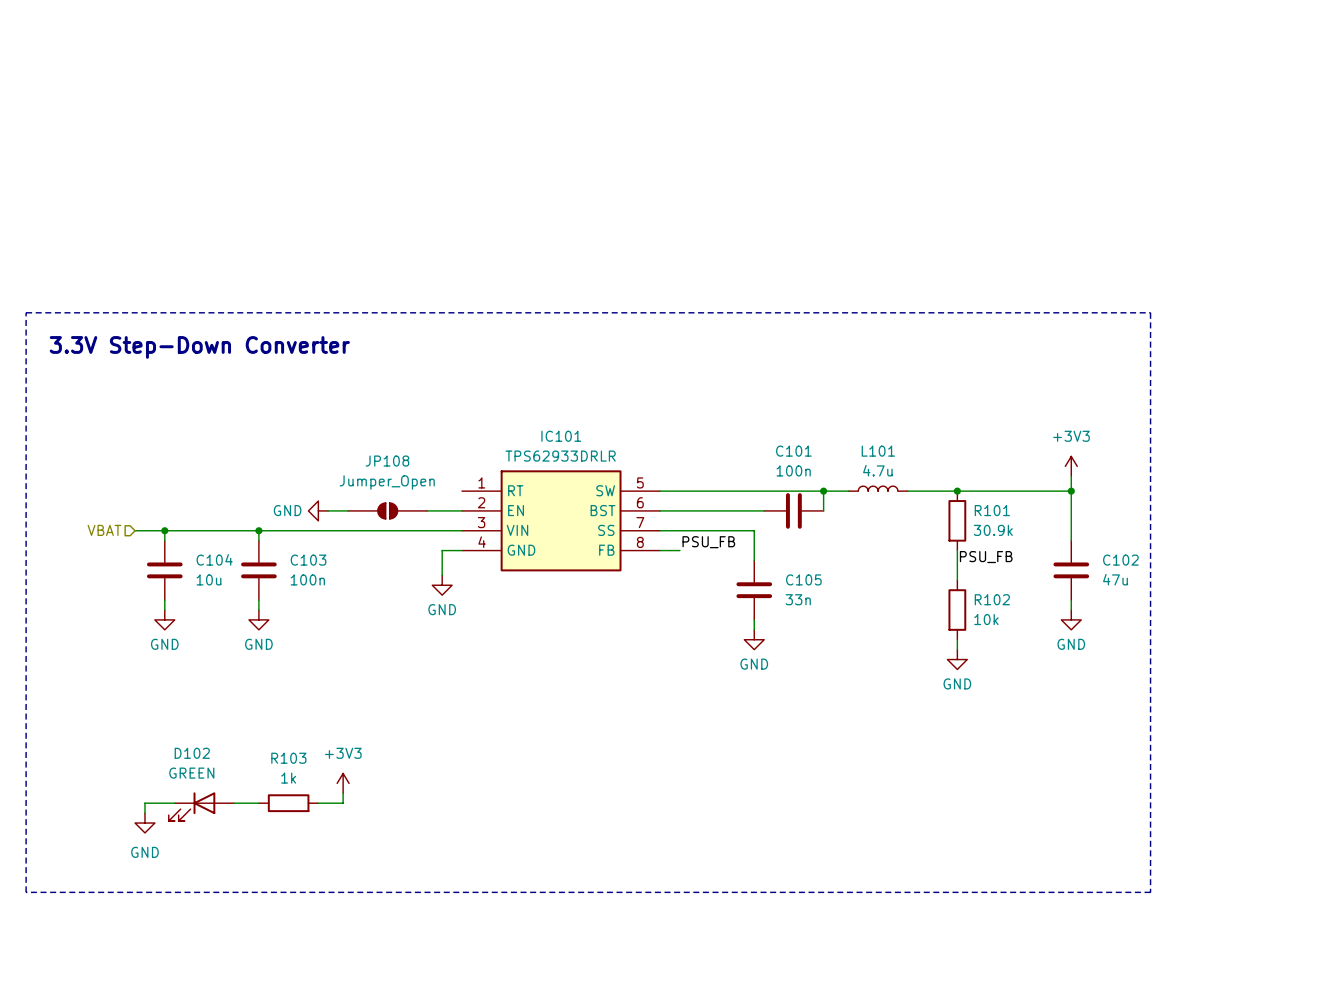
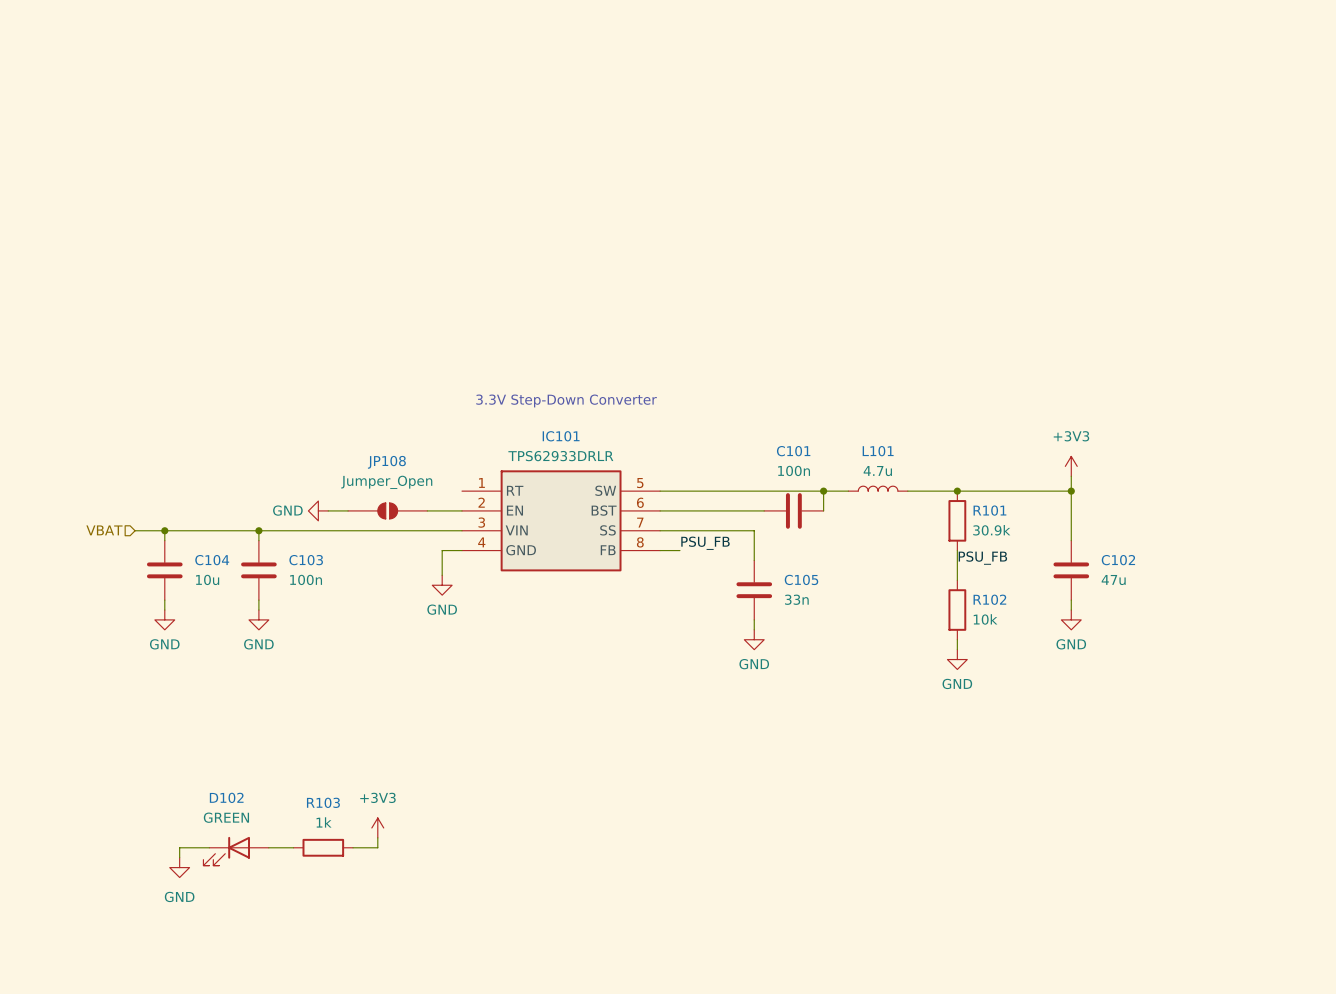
line: (26, 312) (1150, 312) (1150, 892) (26, 892) (26, 312) -> none
text: 3.3V Step-Down Converter (199, 347) -> none
text: none -> 3.3V Step-Down Converter (566, 400)
power symbol position: +3V3 (343, 783) -> +3V3 (377, 827)
wire: (343, 793) (343, 803) (318, 803) -> (377, 837) (377, 847) (353, 847)
wire: (174, 803) (144, 803) (144, 813) -> (209, 847) (179, 847) (179, 857)
wire: (234, 803) (258, 803) -> (268, 847) (293, 847)
R103 position: (288, 803) -> (323, 847)
D102 position: (201, 806) -> (236, 851)
power symbol position: GND (144, 823) -> GND (179, 867)

